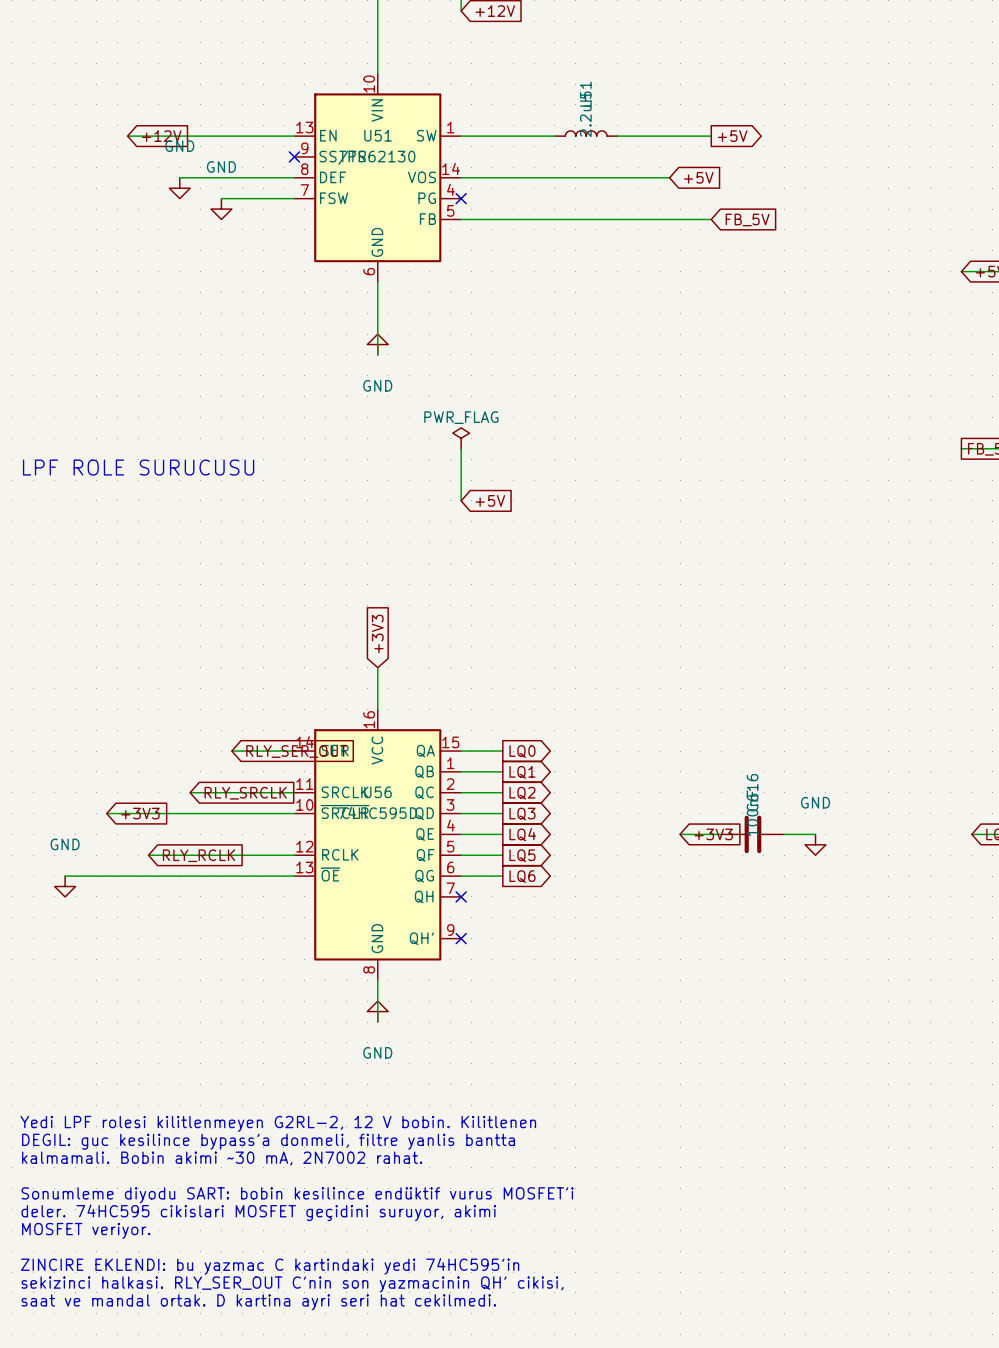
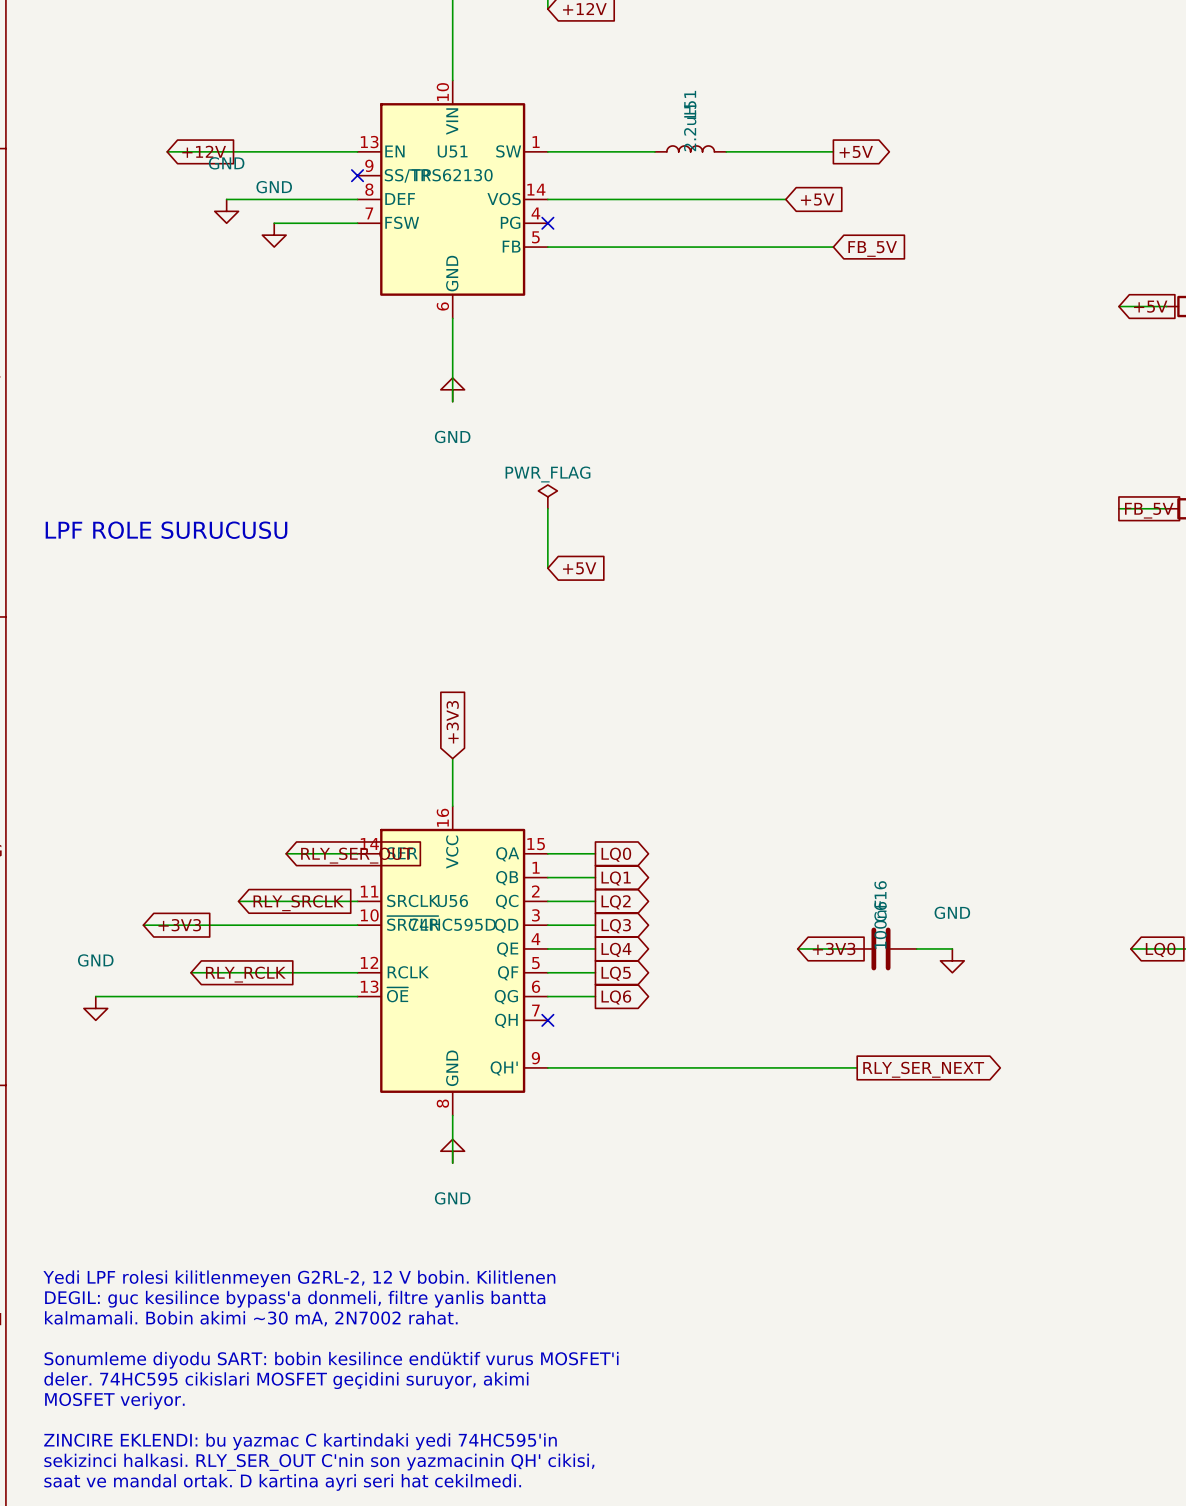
wire: none -> (547, 1067) (857, 1067)
no-connect mark: (461, 938) -> none
global label: none -> RLY_SER_NEXT (923, 1069)

